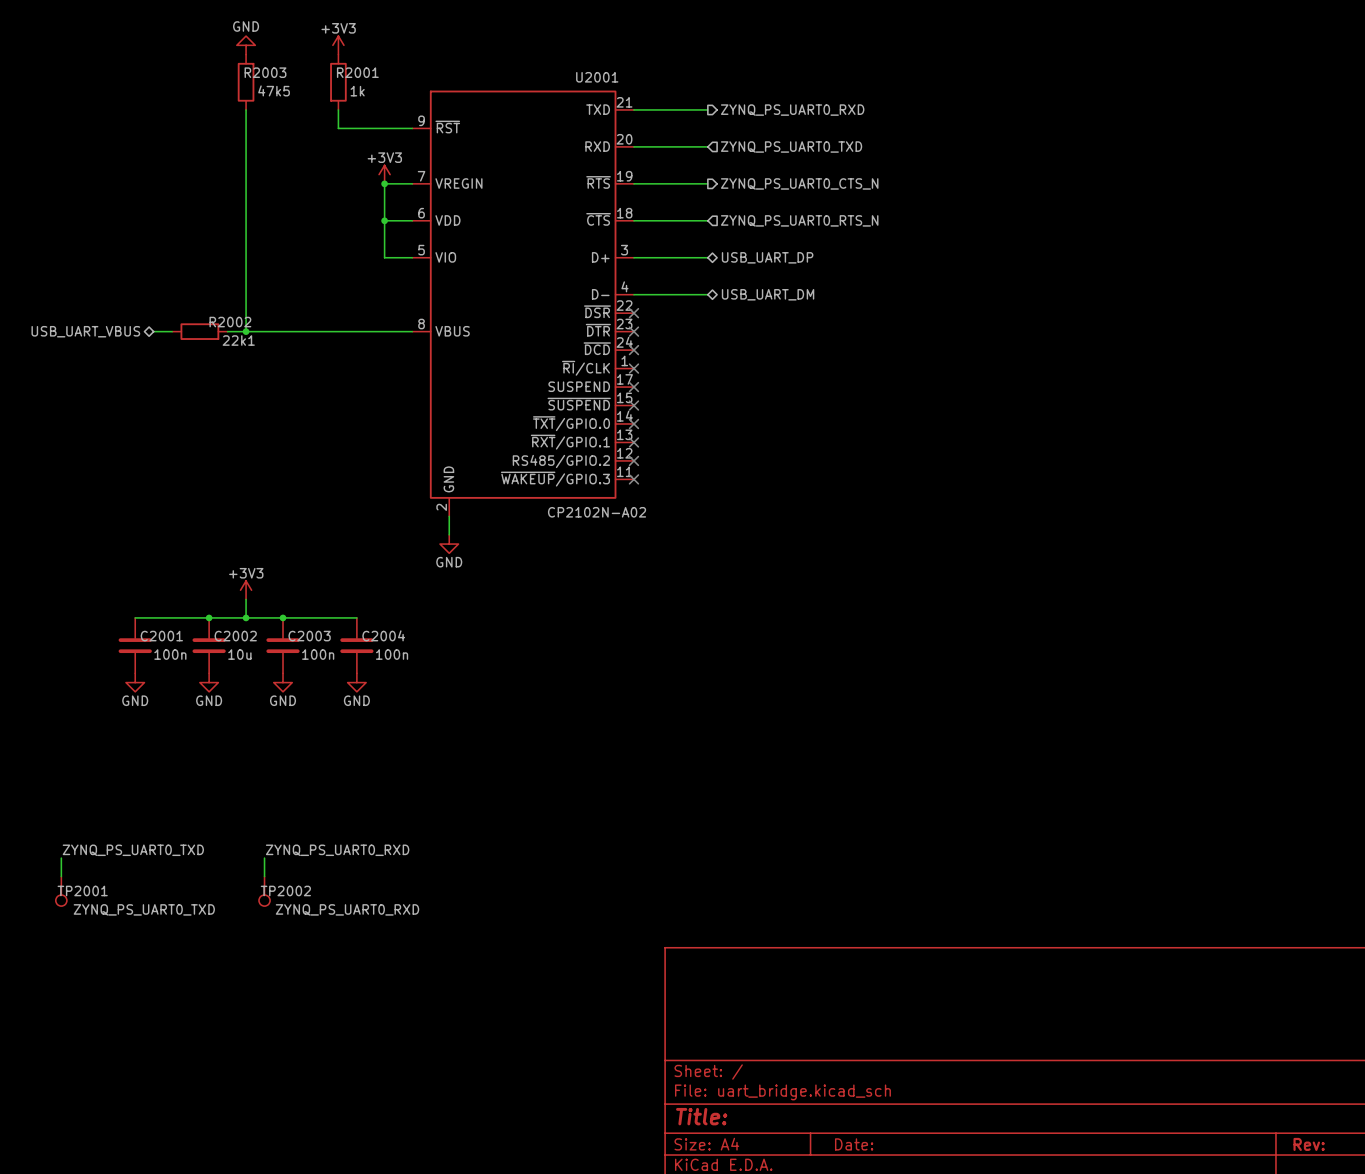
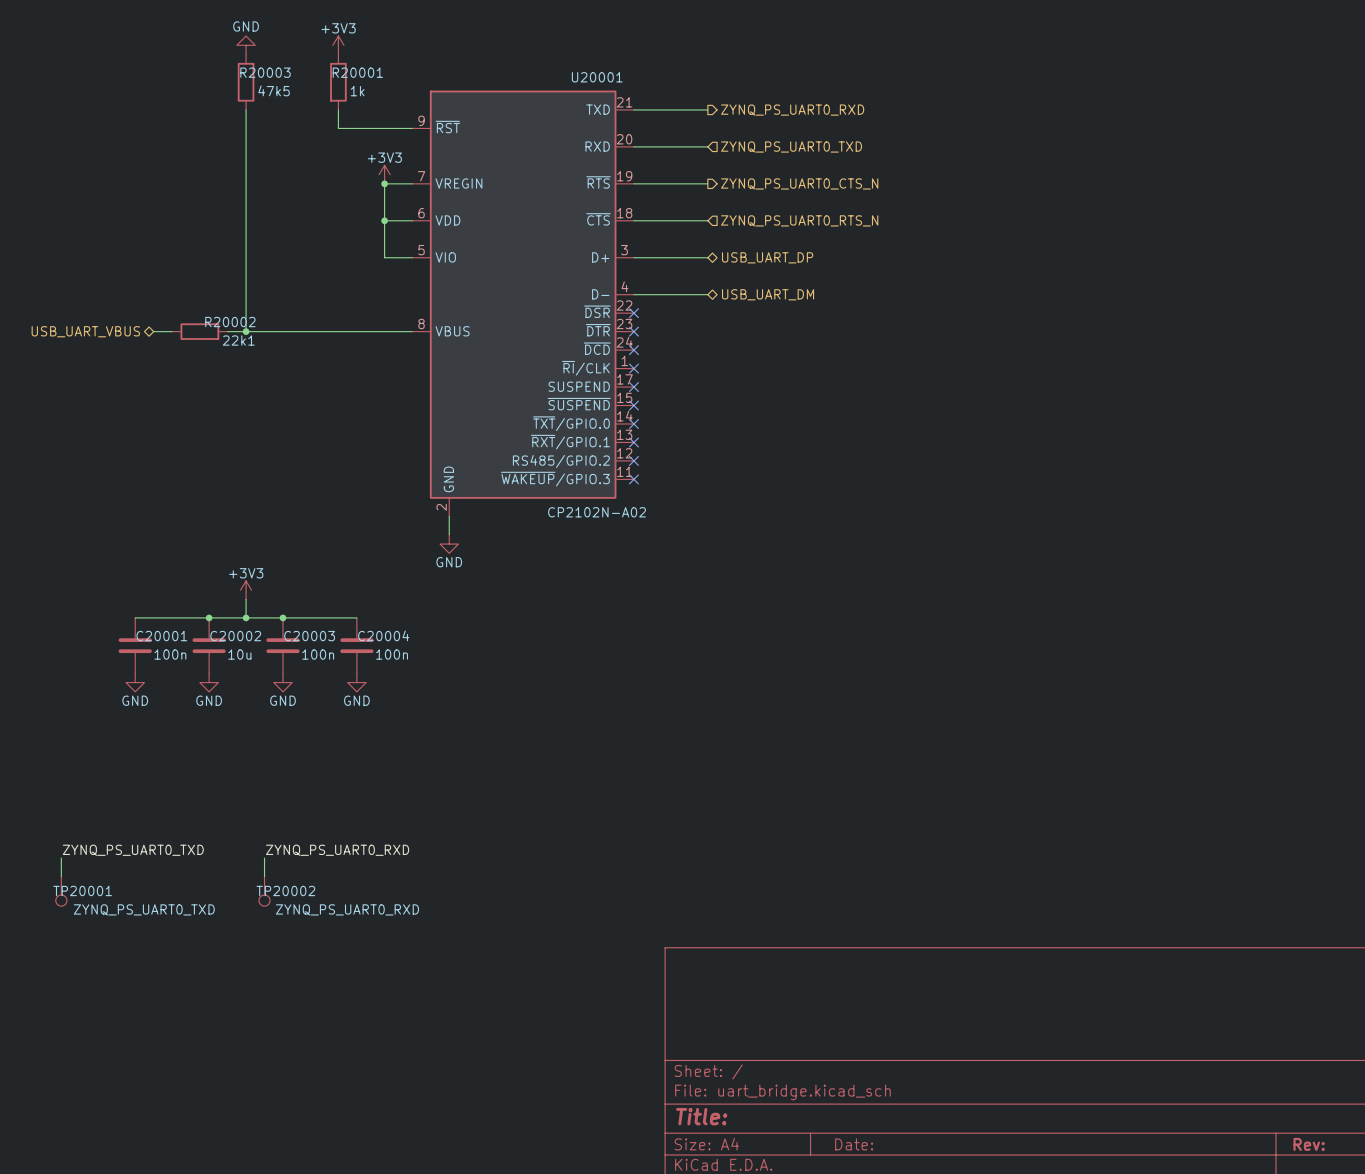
R2003 name: R2003 (265, 72) -> R20003 (265, 72)
R2001 name: R2001 (357, 72) -> R20001 (357, 72)
U2001 name: U2001 (597, 77) -> U20001 (597, 77)
R2002 name: R2002 (230, 322) -> R20002 (230, 322)
C2004 name: C2004 (383, 635) -> C20004 (383, 635)
C2001 name: C2001 (161, 636) -> C20001 (161, 636)
C2002 name: C2002 (235, 636) -> C20002 (235, 636)
C2003 name: C2003 (309, 636) -> C20003 (309, 636)
TP2001 name: TP2001 (82, 890) -> TP20001 (82, 890)
TP2002 name: TP2002 (285, 890) -> TP20002 (285, 890)

